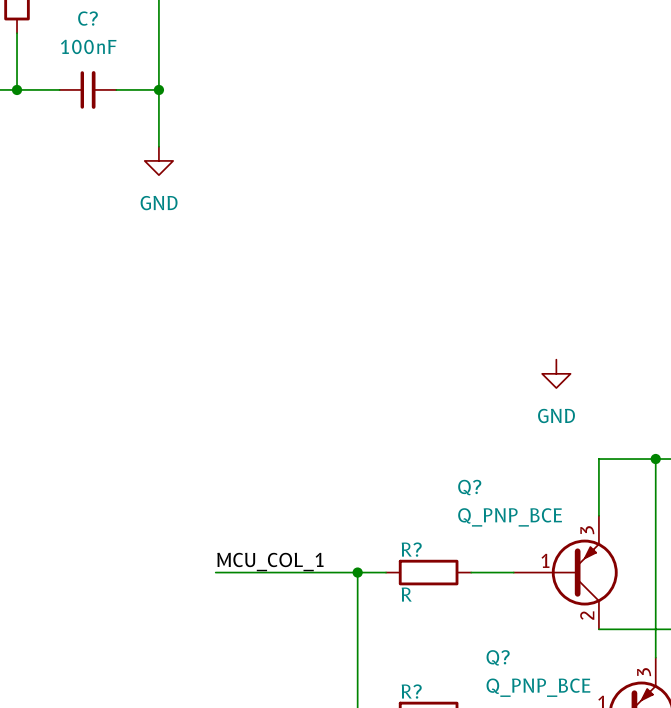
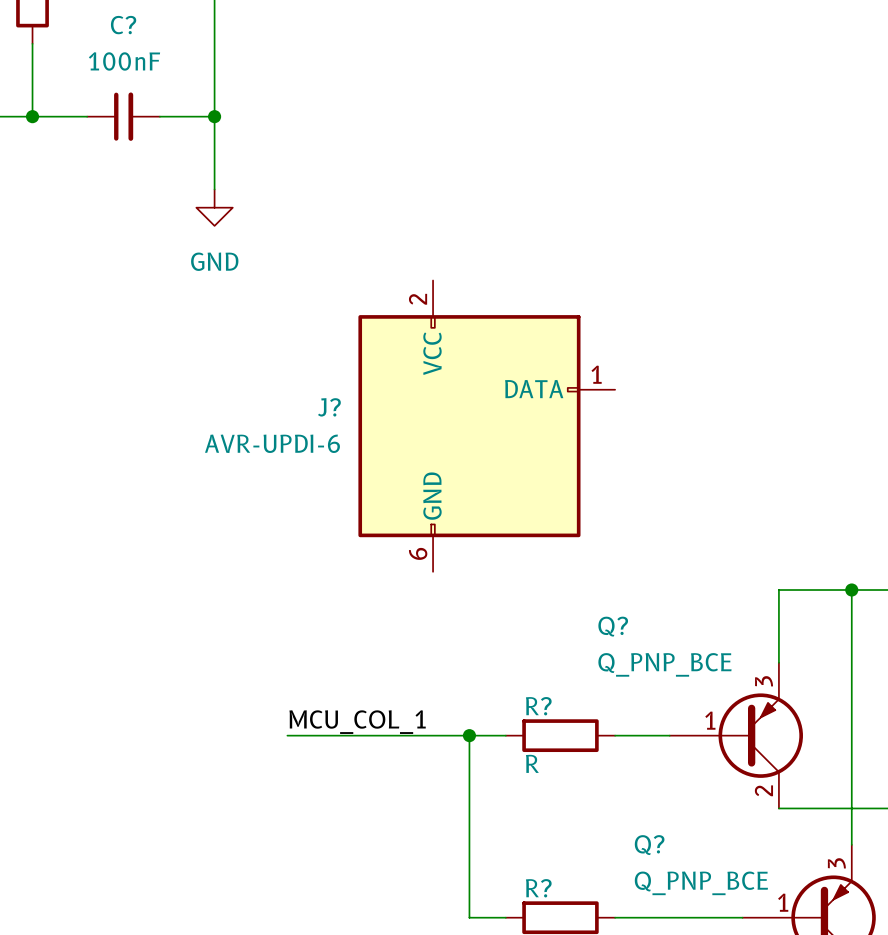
J?: none -> AVR-UPDI-6 (486, 426)
power symbol: GND (556, 373) -> none

